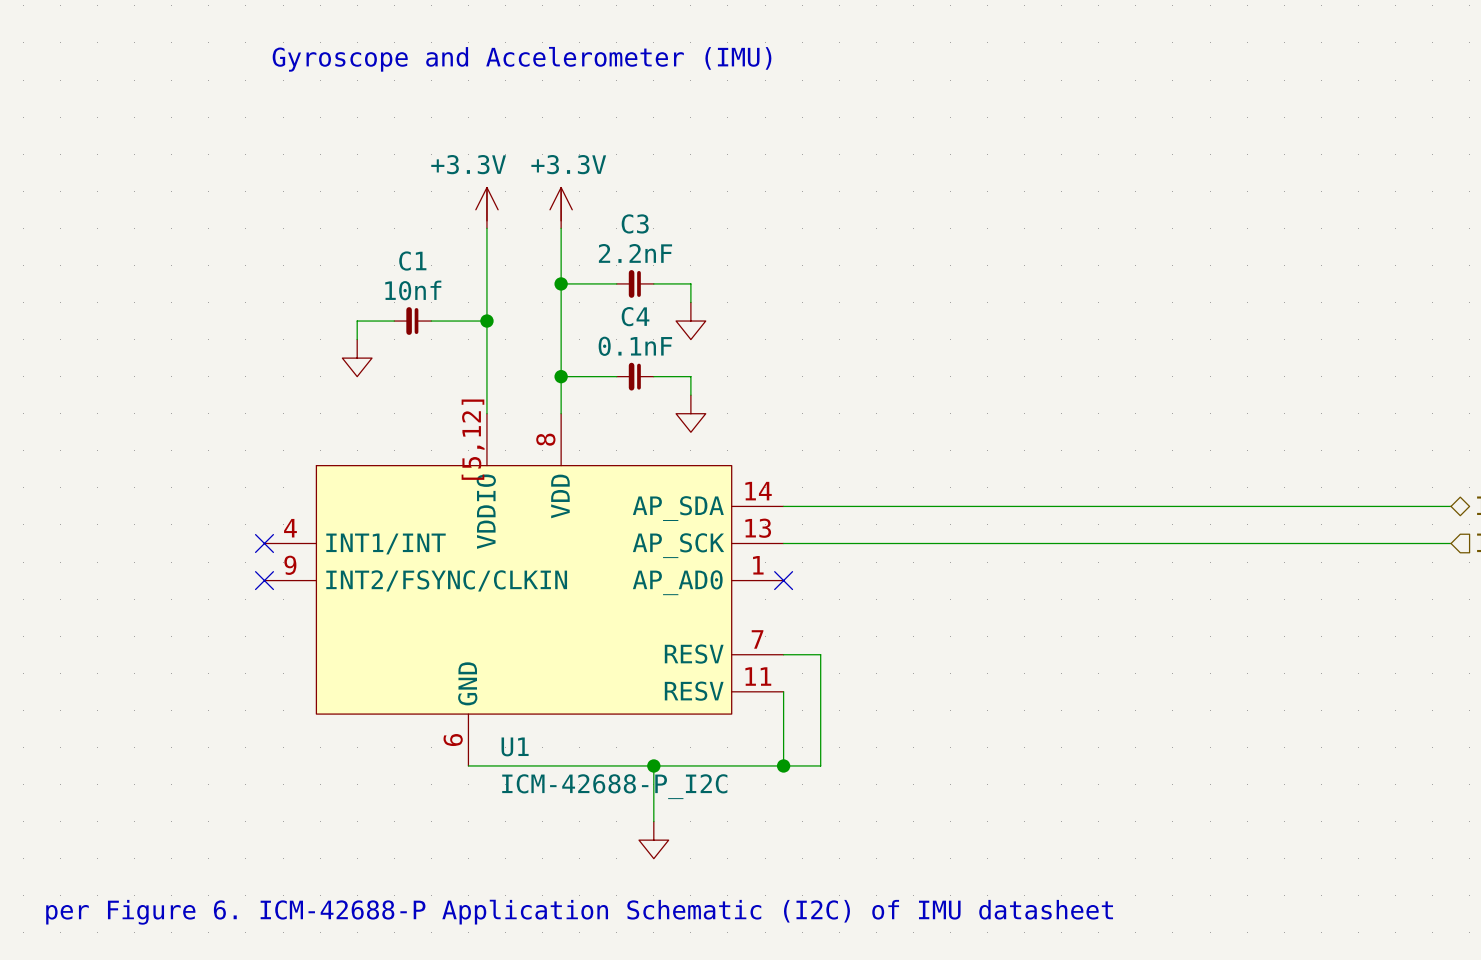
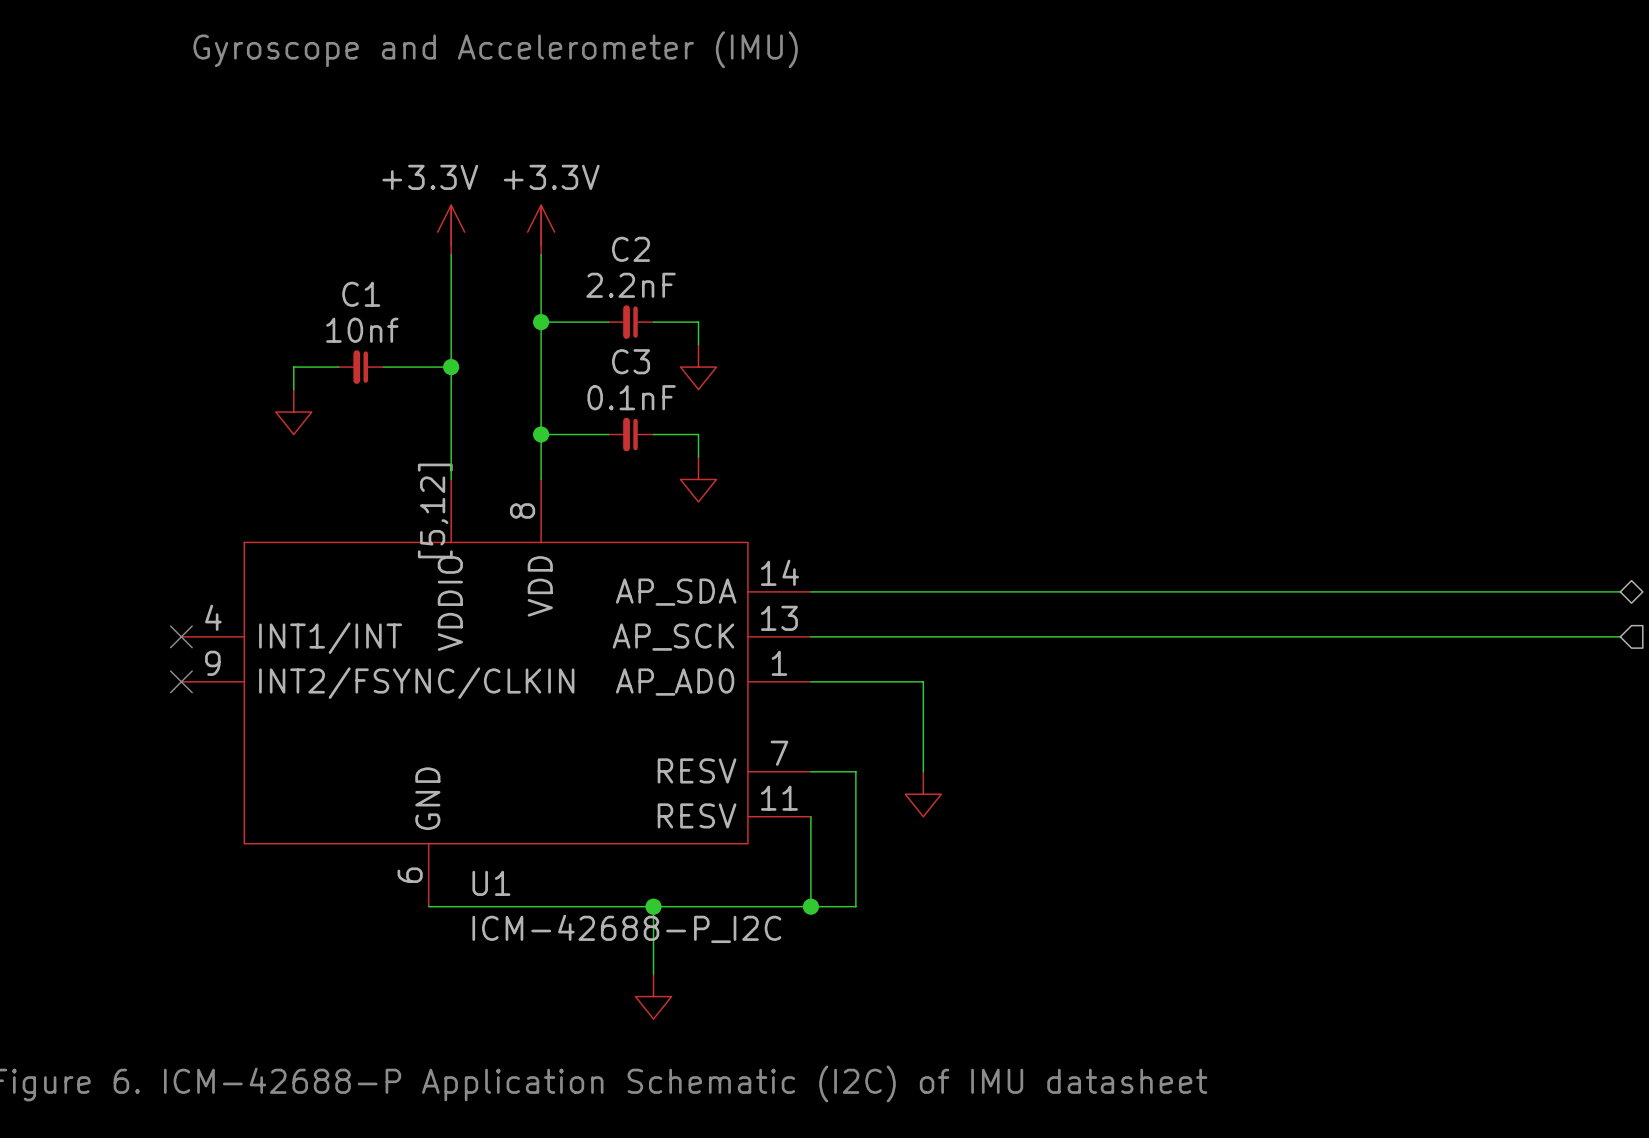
C3 name: C3 (635, 223) -> C2 (631, 249)
C4 name: C4 (635, 316) -> C3 (631, 361)
wire: none -> (810, 681) (923, 681) (923, 771)
no-connect mark: (783, 580) -> none
power symbol: none -> (923, 794)

